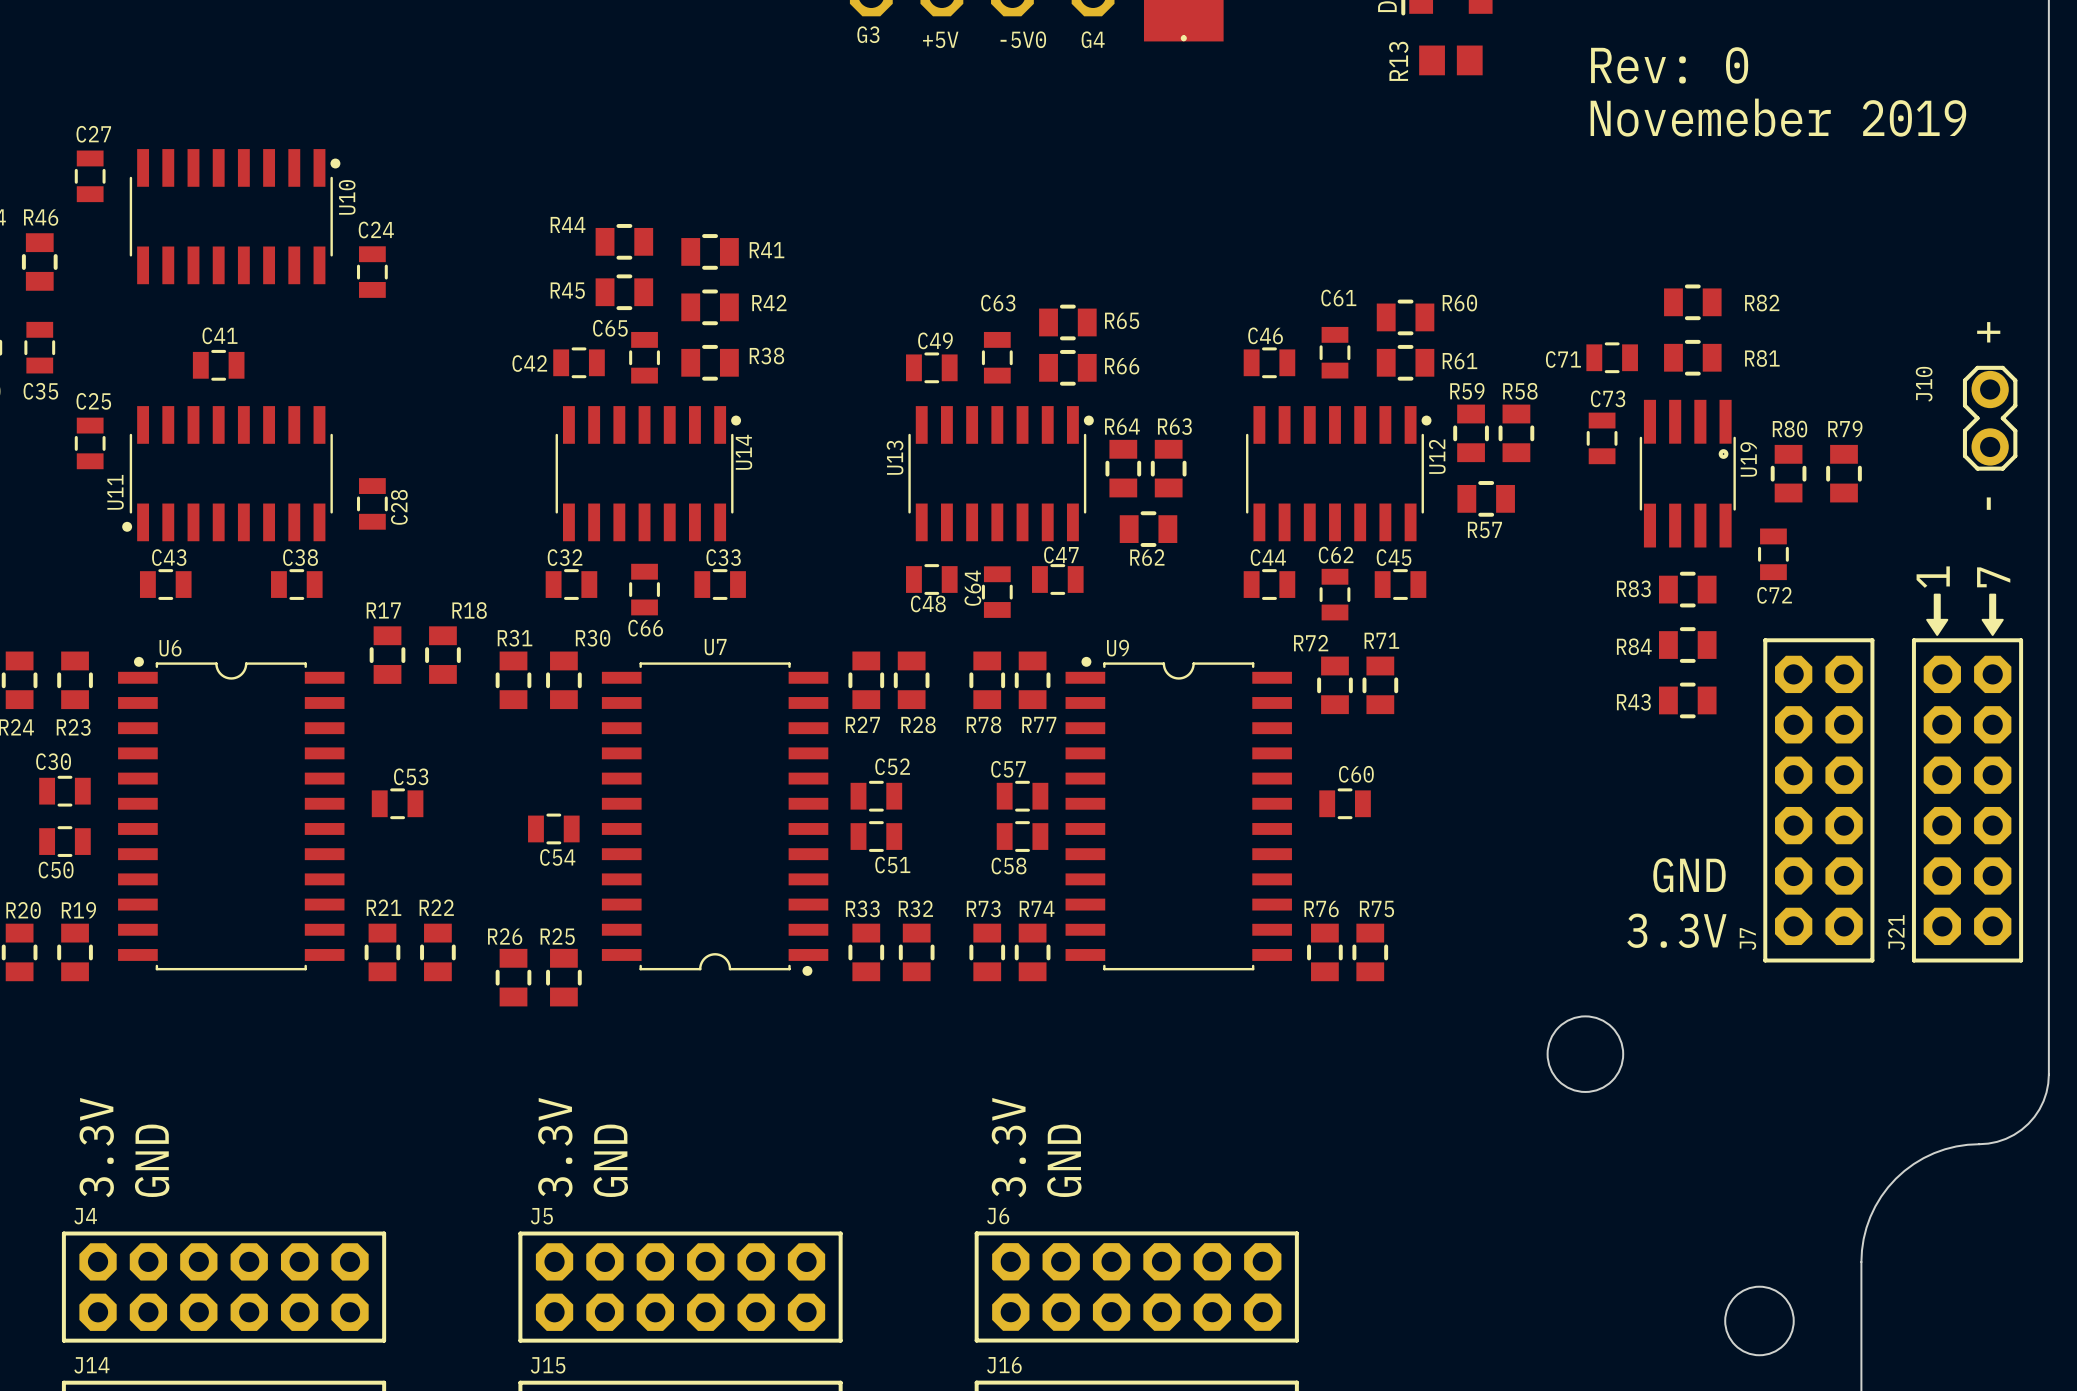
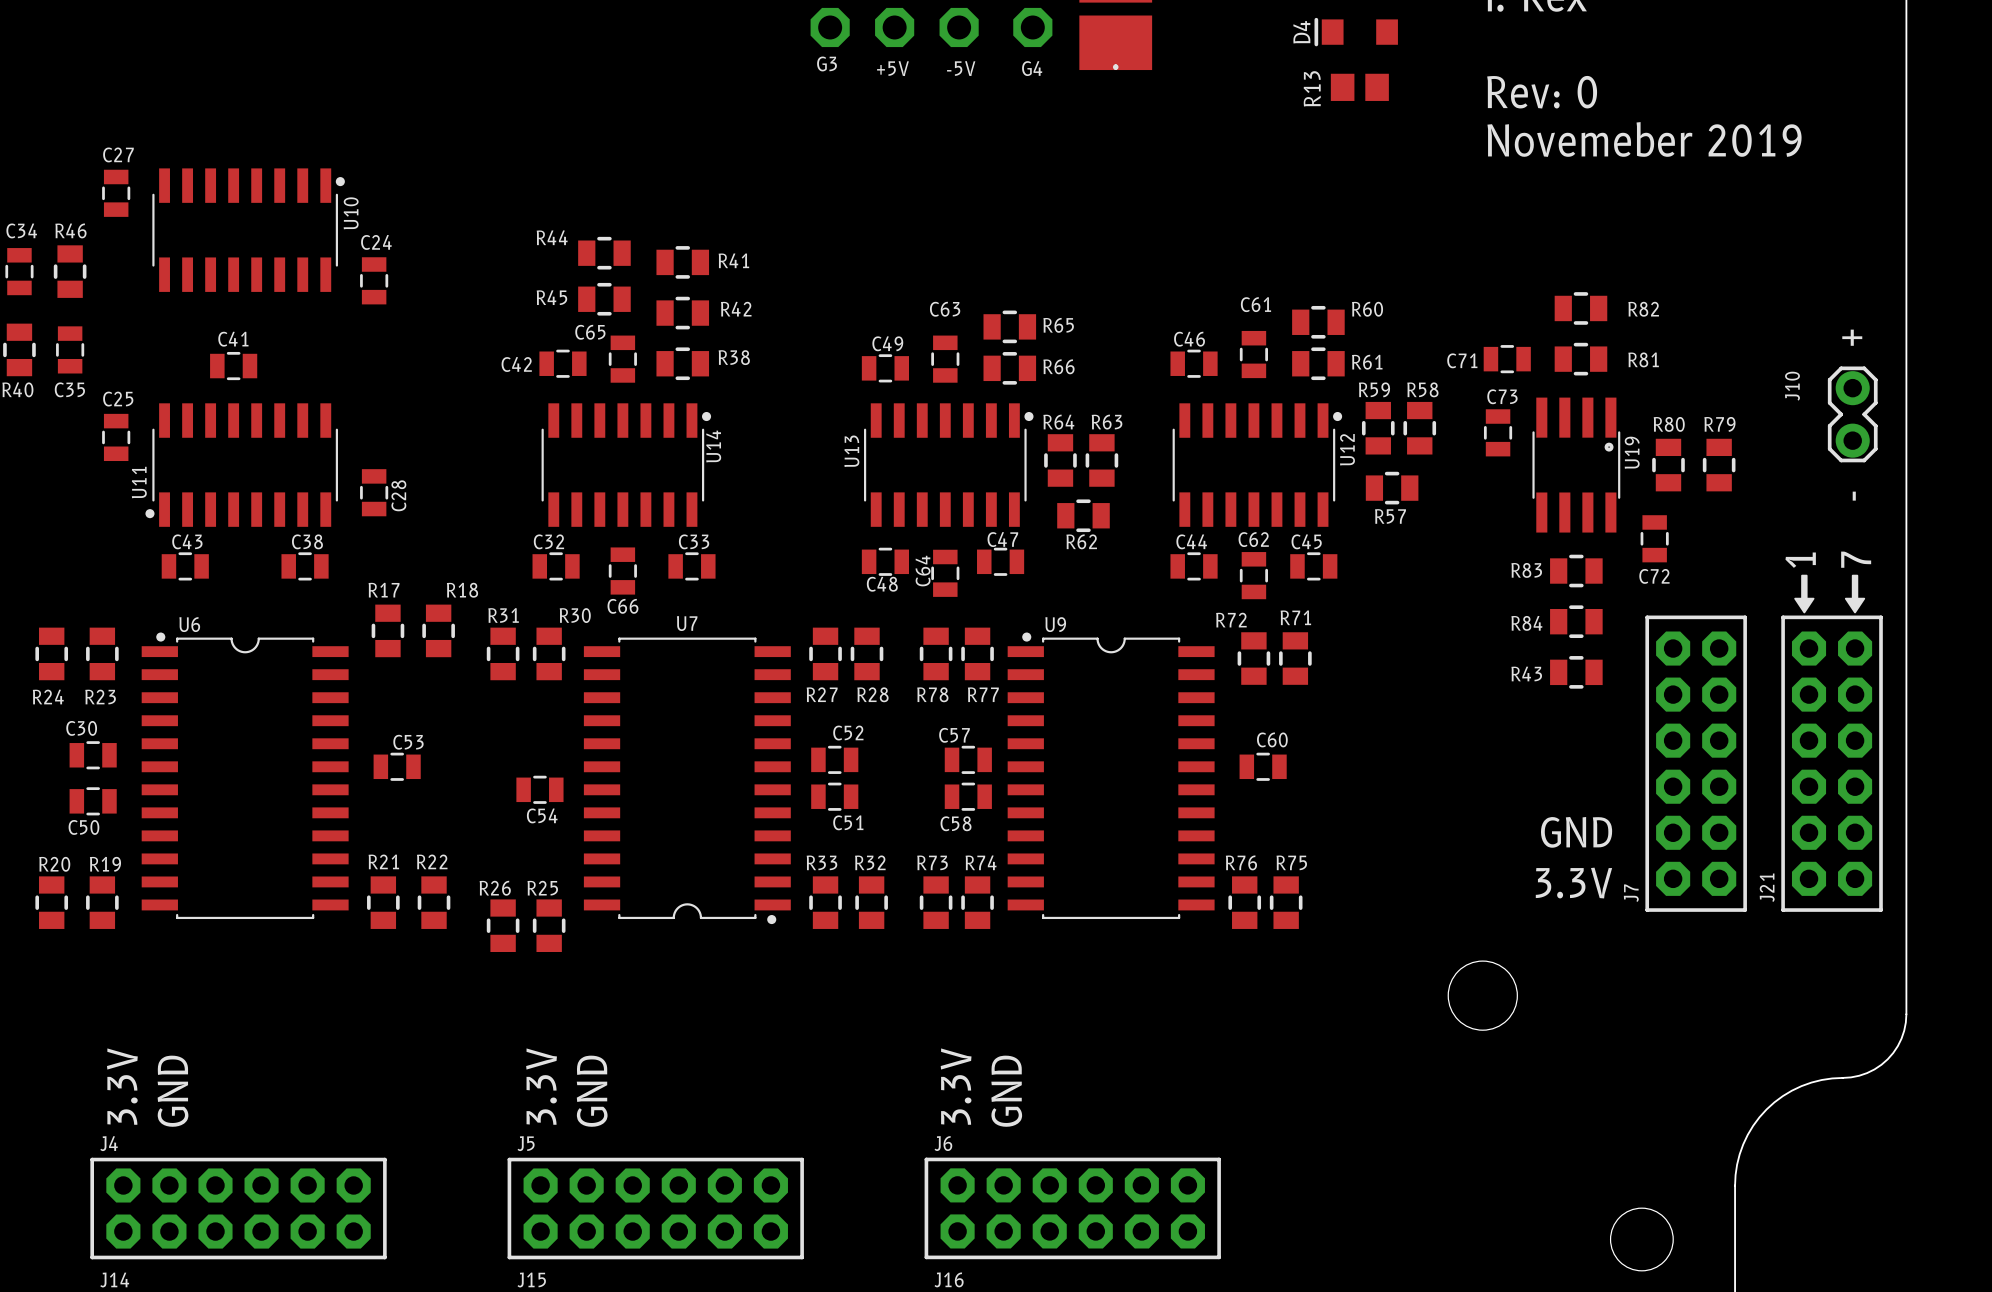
-5V0 name: -5V0 (1023, 39) -> -5V (961, 68)

